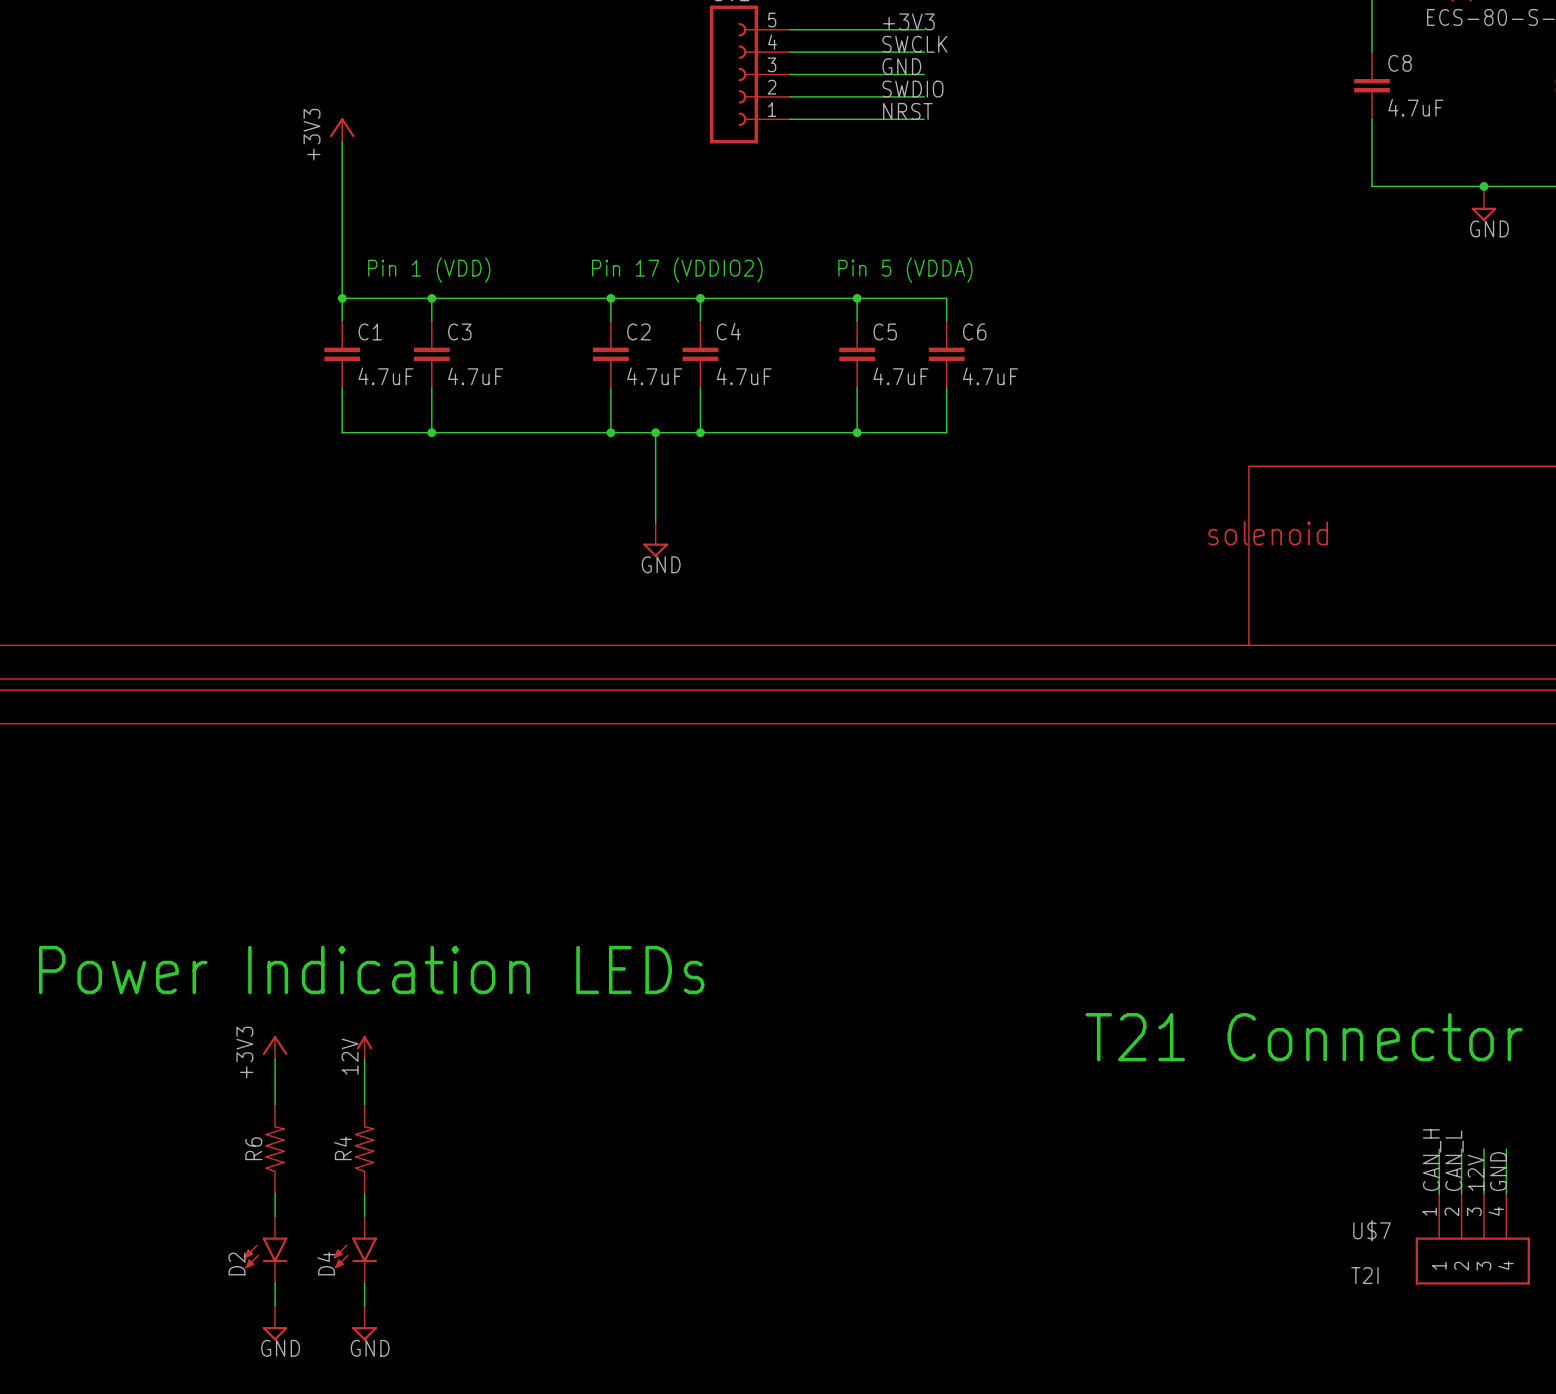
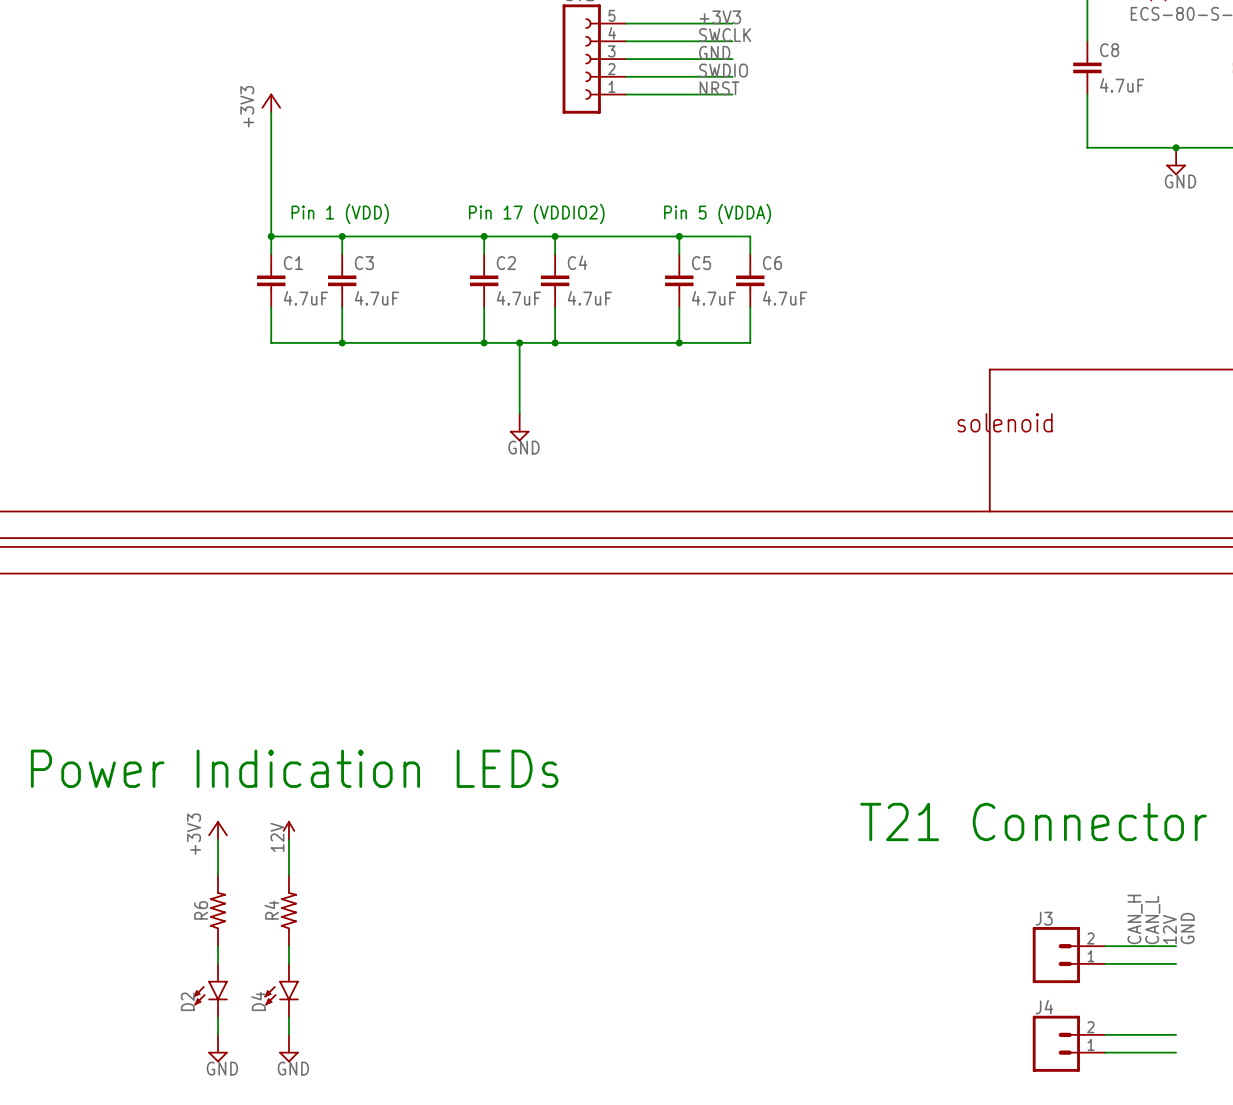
wire: (1439, 1149) (1439, 1193) -> none
wire: (1461, 1149) (1461, 1193) -> none
wire: (1483, 1149) (1483, 1193) -> (1105, 946) (1176, 946)
wire: (1506, 1149) (1506, 1193) -> none
J3: none -> (1068, 955)
wire: none -> (1105, 963) (1176, 963)
U$7: T2I (1472, 1239) -> none
wire: none -> (1105, 1034) (1176, 1034)
J4: none -> (1068, 1043)
wire: none -> (1105, 1052) (1176, 1052)

